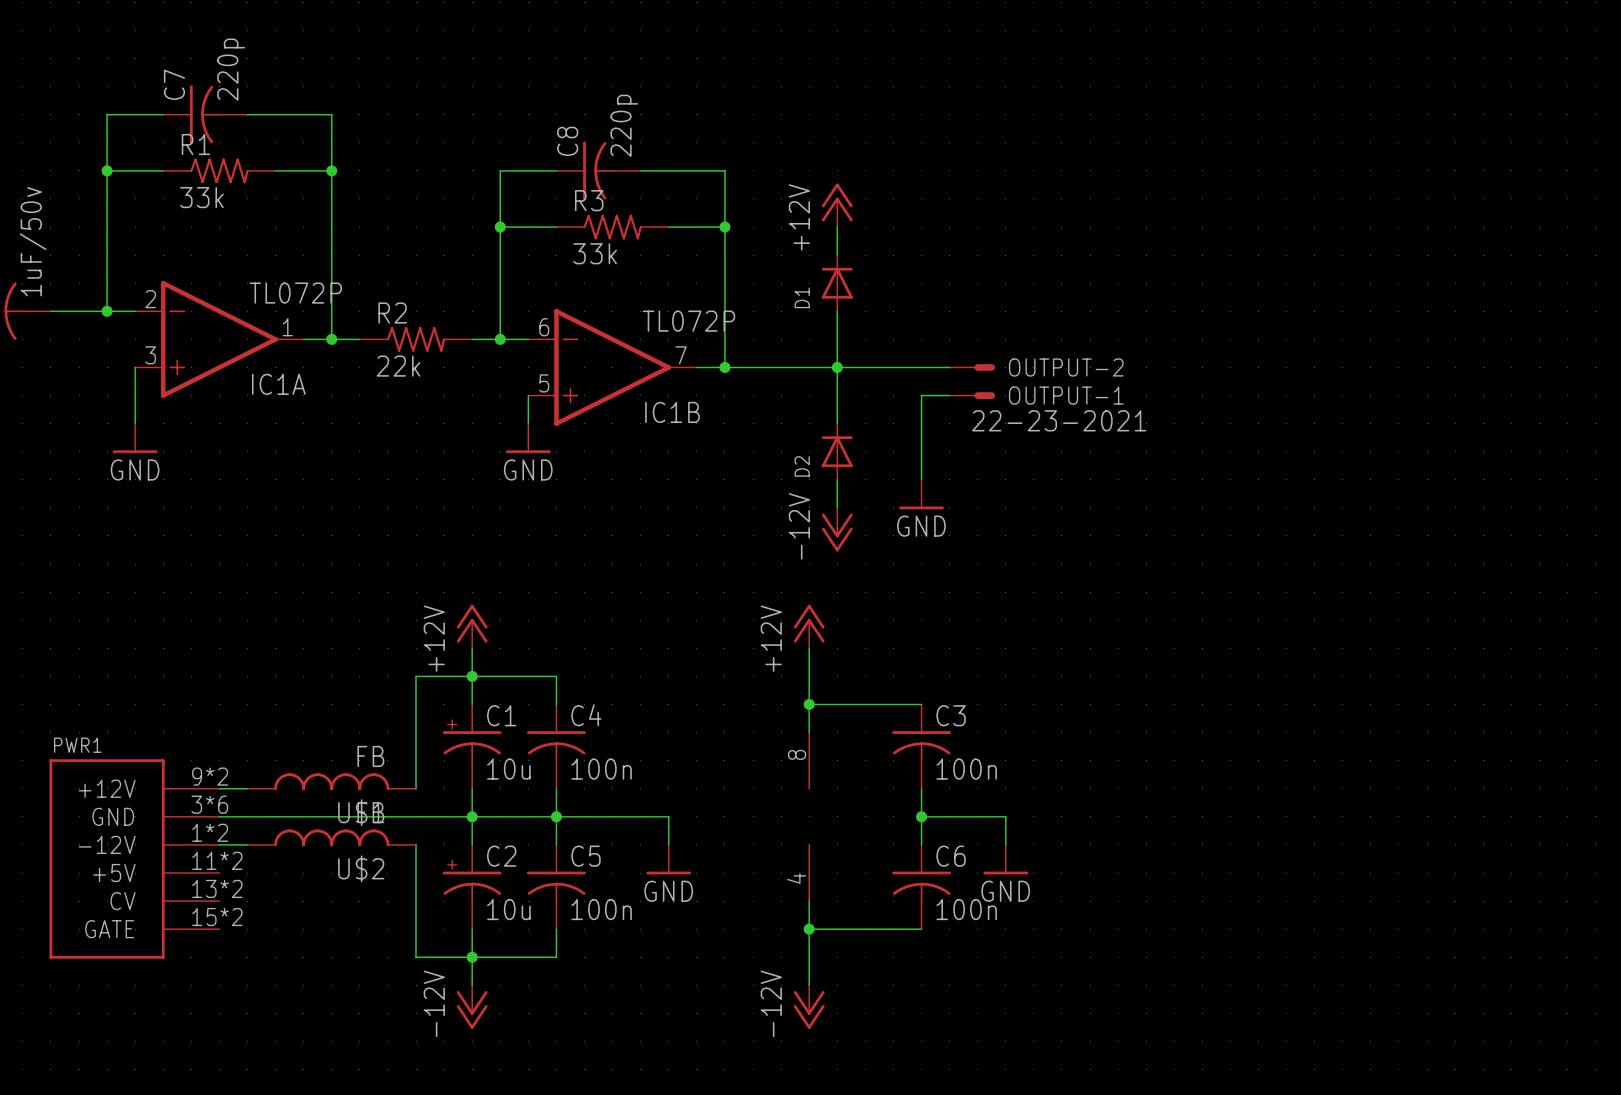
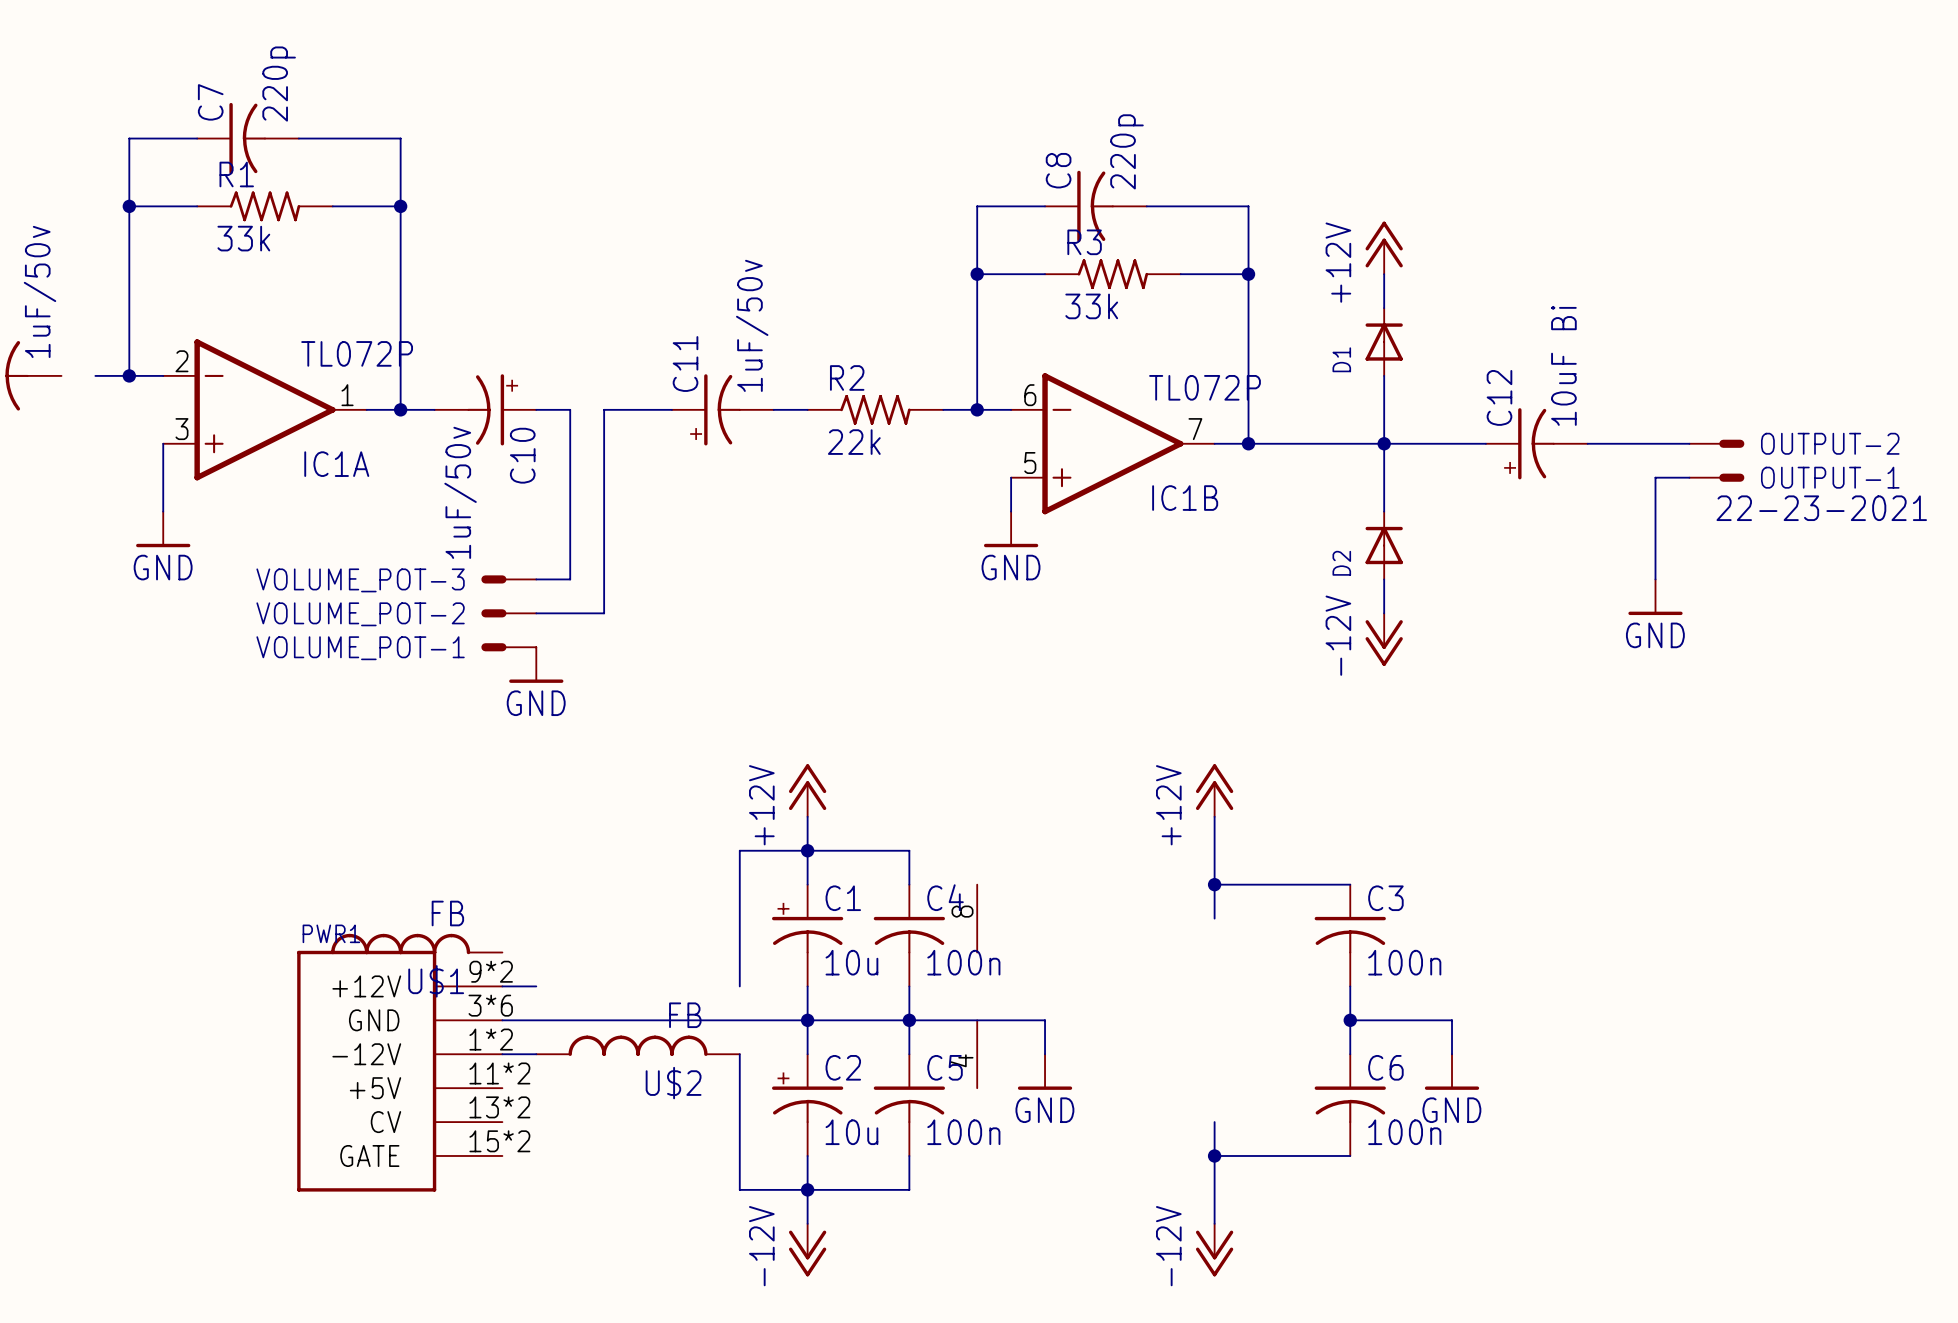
wire: (556, 170) (500, 170) (500, 339) (472, 339) -> none
C8 position: (598, 170) -> (1095, 206)
wire: (640, 170) (724, 170) (724, 367) -> none
wire: none -> (1045, 206) (977, 206) (977, 409)
wire: none -> (1146, 206) (1248, 206) (1248, 443)
power symbol: +12V (837, 205) -> none
power symbol: none -> +12V (1384, 247)
wire: (500, 227) (556, 227) -> none
junction: (500, 227) -> none
R3 position: (612, 227) -> (1112, 274)
wire: (668, 227) (724, 227) -> (977, 274) (1045, 274)
junction: (724, 227) -> none
junction: none -> (977, 274)
wire: (837, 227) (837, 255) -> none
wire: none -> (1180, 274) (1248, 274)
junction: none -> (1248, 274)
wire: none -> (1384, 274) (1384, 308)
D1 position: (837, 283) -> (1384, 342)
wire: (50, 311) (79, 311) -> none
wire: (837, 311) (837, 395) -> none
wire: none -> (1384, 375) (1384, 511)
C10: none -> 1uF/50v (485, 409)
R2 position: (416, 339) -> (875, 409)
wire: none -> (536, 409) (570, 409) (570, 579) (536, 579)
wire: none -> (604, 409) (604, 613) (536, 613)
junction: (500, 339) -> none
C11: none -> 1uF/50v (722, 409)
wire: none -> (773, 409) (807, 409)
wire: none -> (943, 409) (1011, 409)
IC1B position: (612, 367) -> (1112, 443)
wire: (696, 367) (949, 367) -> none
junction: (724, 367) -> none
junction position: (837, 367) -> (977, 409)
OUTPUT-2 position: (972, 367) -> (1716, 443)
wire: none -> (1214, 443) (1485, 443)
junction: none -> (1248, 443)
junction: none -> (1384, 443)
C12: none -> 10uF Bi (1536, 443)
wire: none -> (1587, 443) (1689, 443)
wire: (528, 395) (528, 423) -> none
wire: (949, 395) (921, 395) (921, 479) -> none
OUTPUT-1 position: (972, 395) -> (1716, 477)
wire: none -> (1689, 477) (1655, 477) (1655, 579)
power symbol position: GND (528, 438) -> GND (536, 665)
D2 position: (837, 451) -> (1384, 545)
VOLUME_POT-3: none -> (508, 579)
wire: (837, 479) (837, 507) -> none
wire: none -> (1384, 579) (1384, 613)
power symbol position: GND (921, 494) -> GND (1011, 529)
power symbol: none -> GND (1655, 597)
VOLUME_POT-2: none -> (508, 613)
power symbol: -12V (837, 529) -> none
power symbol: none -> -12V (1384, 639)
VOLUME_POT-1: none -> (508, 647)
power symbol: +12V (472, 626) -> none
power symbol: +12V (809, 626) -> none
wire: (472, 648) (472, 704) -> (807, 816) (807, 884)
wire: (809, 648) (809, 732) -> (1214, 816) (1214, 918)
power symbol: none -> +12V (807, 790)
power symbol: none -> +12V (1214, 790)
junction: (472, 676) -> none
wire: (556, 704) (556, 676) (416, 676) (416, 788) -> (909, 884) (909, 850) (739, 850) (739, 986)
junction: none -> (807, 850)
wire: (809, 704) (921, 704) -> (1214, 884) (1350, 884)
junction: (809, 704) -> none
junction: none -> (1214, 884)
C1 position: (472, 746) -> (807, 935)
C4 position: (556, 746) -> (909, 935)
C3 position: (921, 746) -> (1350, 935)
wire: (219, 788) (247, 788) -> none
wire: (472, 788) (472, 844) -> none
wire: (556, 788) (556, 844) -> (909, 986) (909, 1054)
wire: (921, 788) (921, 844) -> (1350, 986) (1350, 1054)
wire: (219, 816) (416, 816) -> none
wire: (444, 816) (668, 816) -> none
junction: (472, 816) -> none
junction: (556, 816) -> none
wire: (921, 816) (1005, 816) (1005, 844) -> (1350, 1020) (1452, 1020) (1452, 1054)
junction: (921, 816) -> none
U$2 position: (331, 837) -> (638, 1045)
wire: (219, 844) (247, 844) -> (502, 1054) (536, 1054)
wire: (416, 844) (416, 957) (556, 957) (556, 929) -> (502, 1020) (1045, 1020) (1045, 1054)
junction: none -> (807, 1020)
junction: none -> (909, 1020)
junction: none -> (1350, 1020)
PWR1 position: (134, 858) -> (399, 1071)
power symbol: GND (668, 859) -> none
power symbol: GND (1005, 859) -> none
wire: none -> (739, 1054) (739, 1189) (909, 1189) (909, 1155)
C2 position: (472, 887) -> (807, 1105)
C5 position: (556, 887) -> (909, 1105)
power symbol: none -> GND (1045, 1072)
C6 position: (921, 887) -> (1350, 1105)
power symbol: none -> GND (1452, 1072)
wire: (809, 901) (809, 985) -> (1214, 1122) (1214, 1223)
wire: (472, 929) (472, 985) -> (807, 1155) (807, 1223)
wire: (809, 929) (921, 929) -> (1214, 1155) (1350, 1155)
junction: (809, 929) -> none
junction: (472, 957) -> none
junction: none -> (1214, 1155)
junction: none -> (807, 1189)
power symbol: -12V (472, 1007) -> none
power symbol: -12V (809, 1007) -> none
power symbol: none -> -12V (807, 1250)
power symbol: none -> -12V (1214, 1250)

